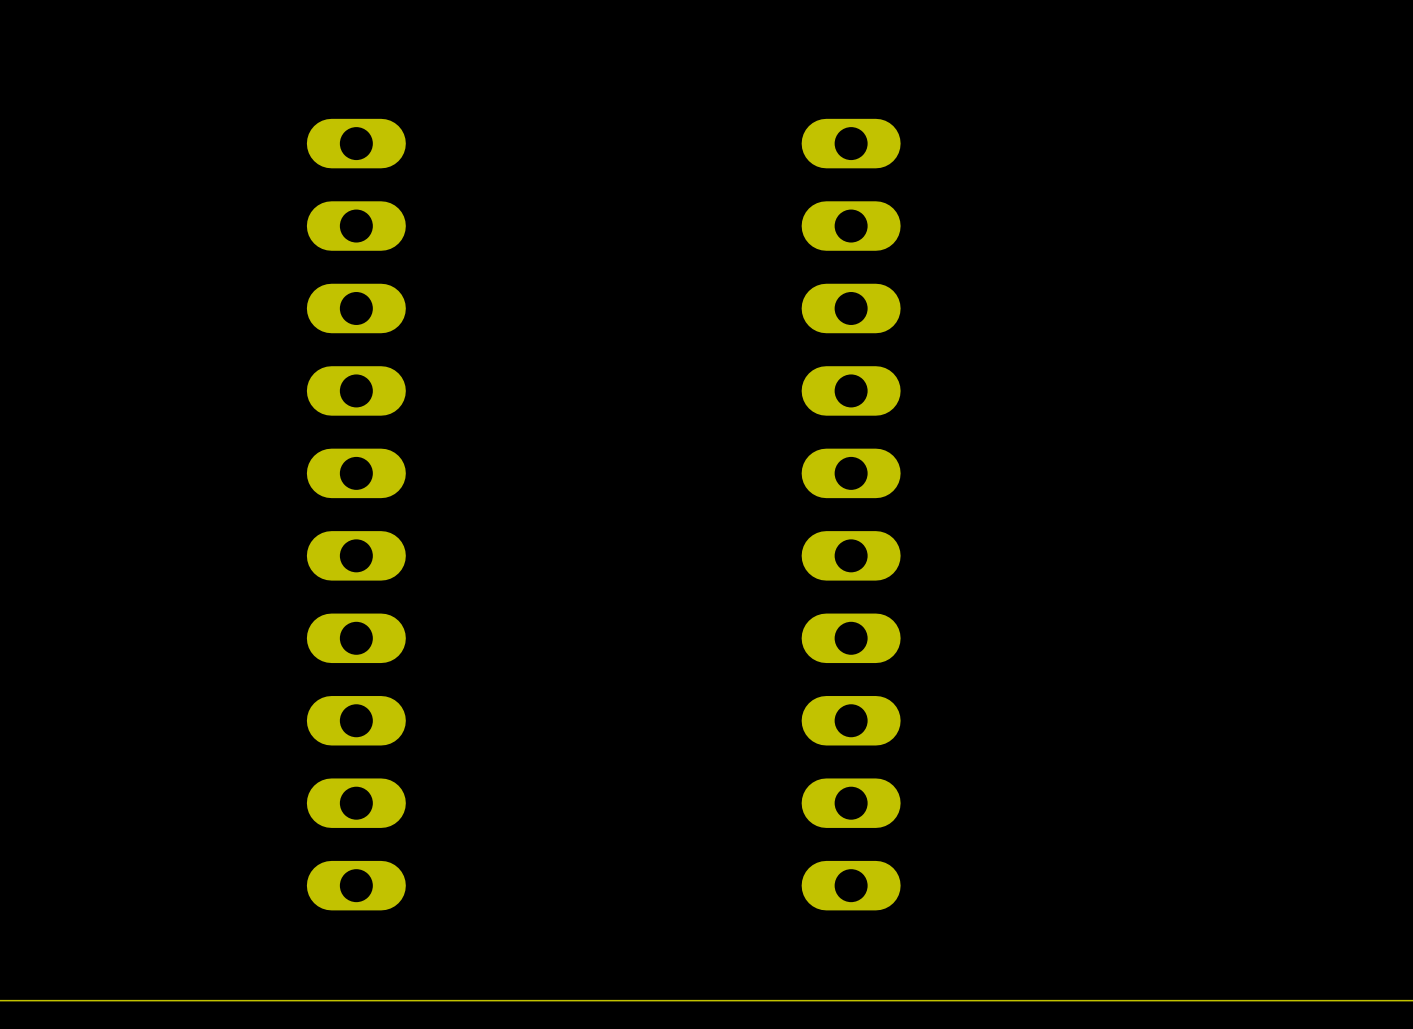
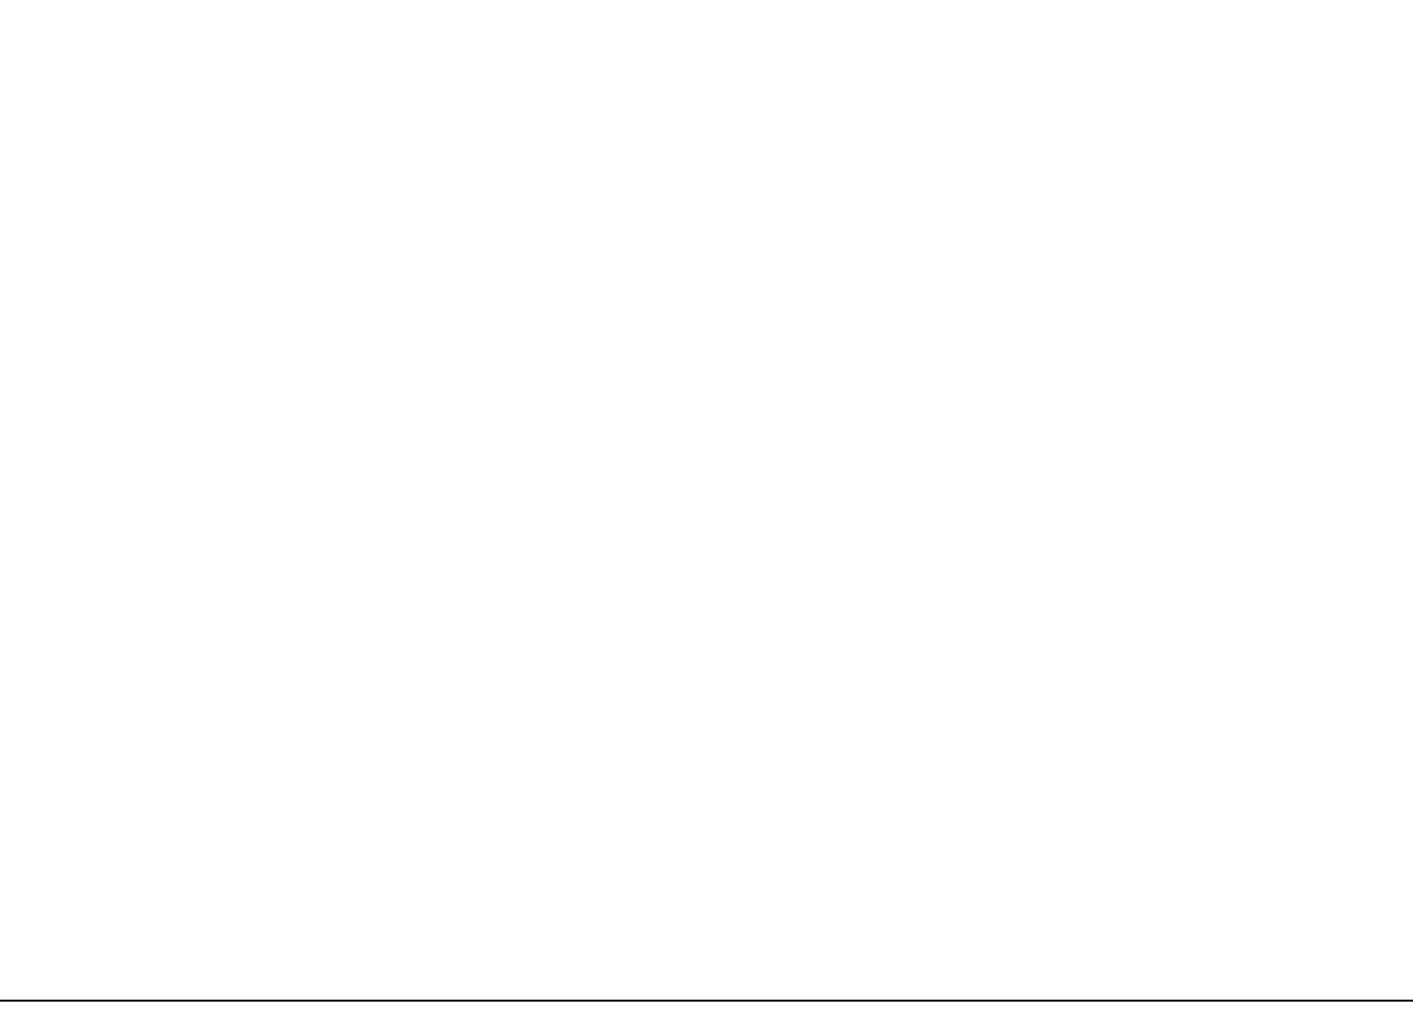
part: (356, 514) -> none
part: (851, 514) -> none

